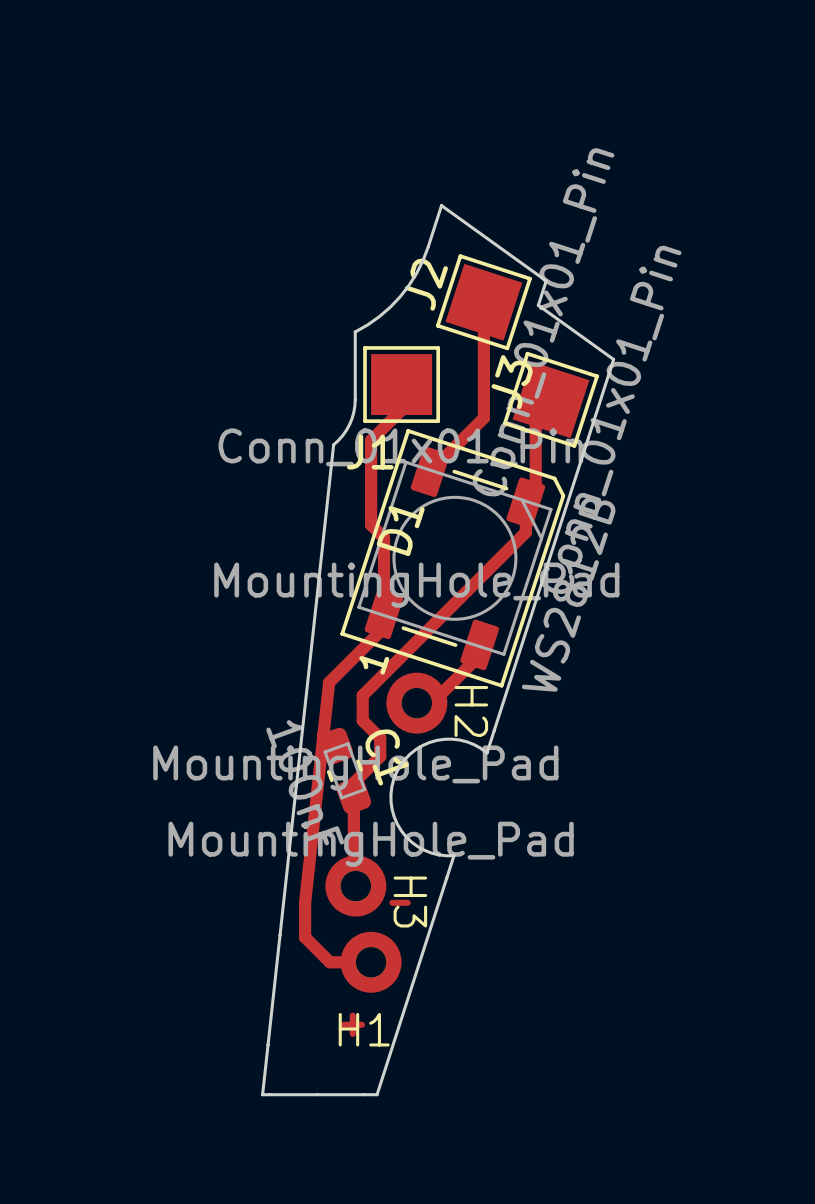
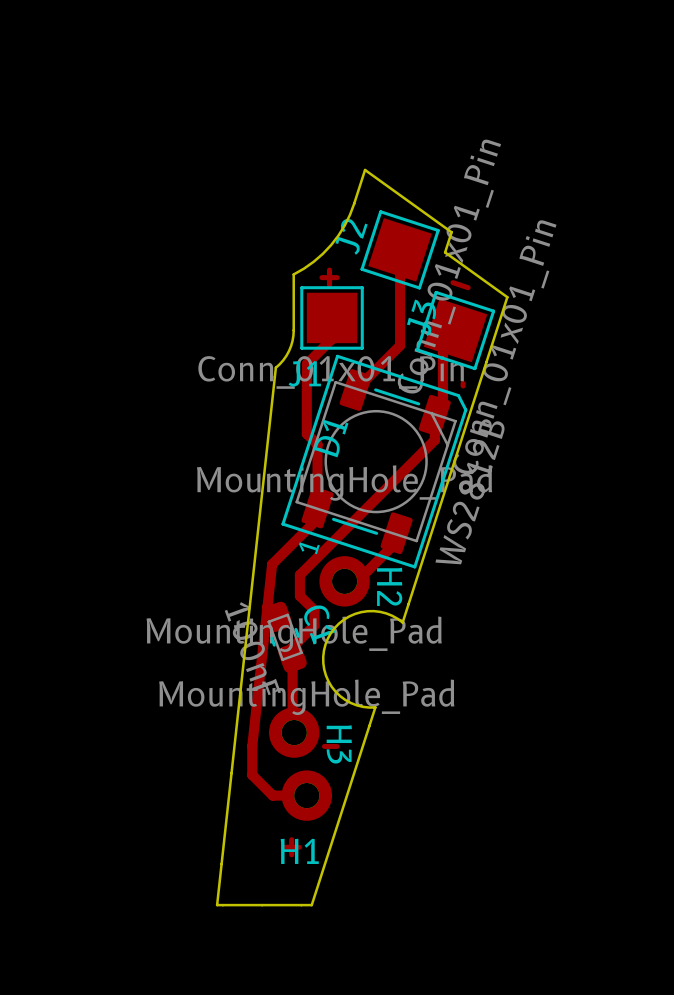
top track: none -> (329, 270) (329, 285)
top track: none -> (321, 277) (337, 277)
top track: none -> (453, 282) (468, 287)
top track: none -> (463, 383) (463, 386)

